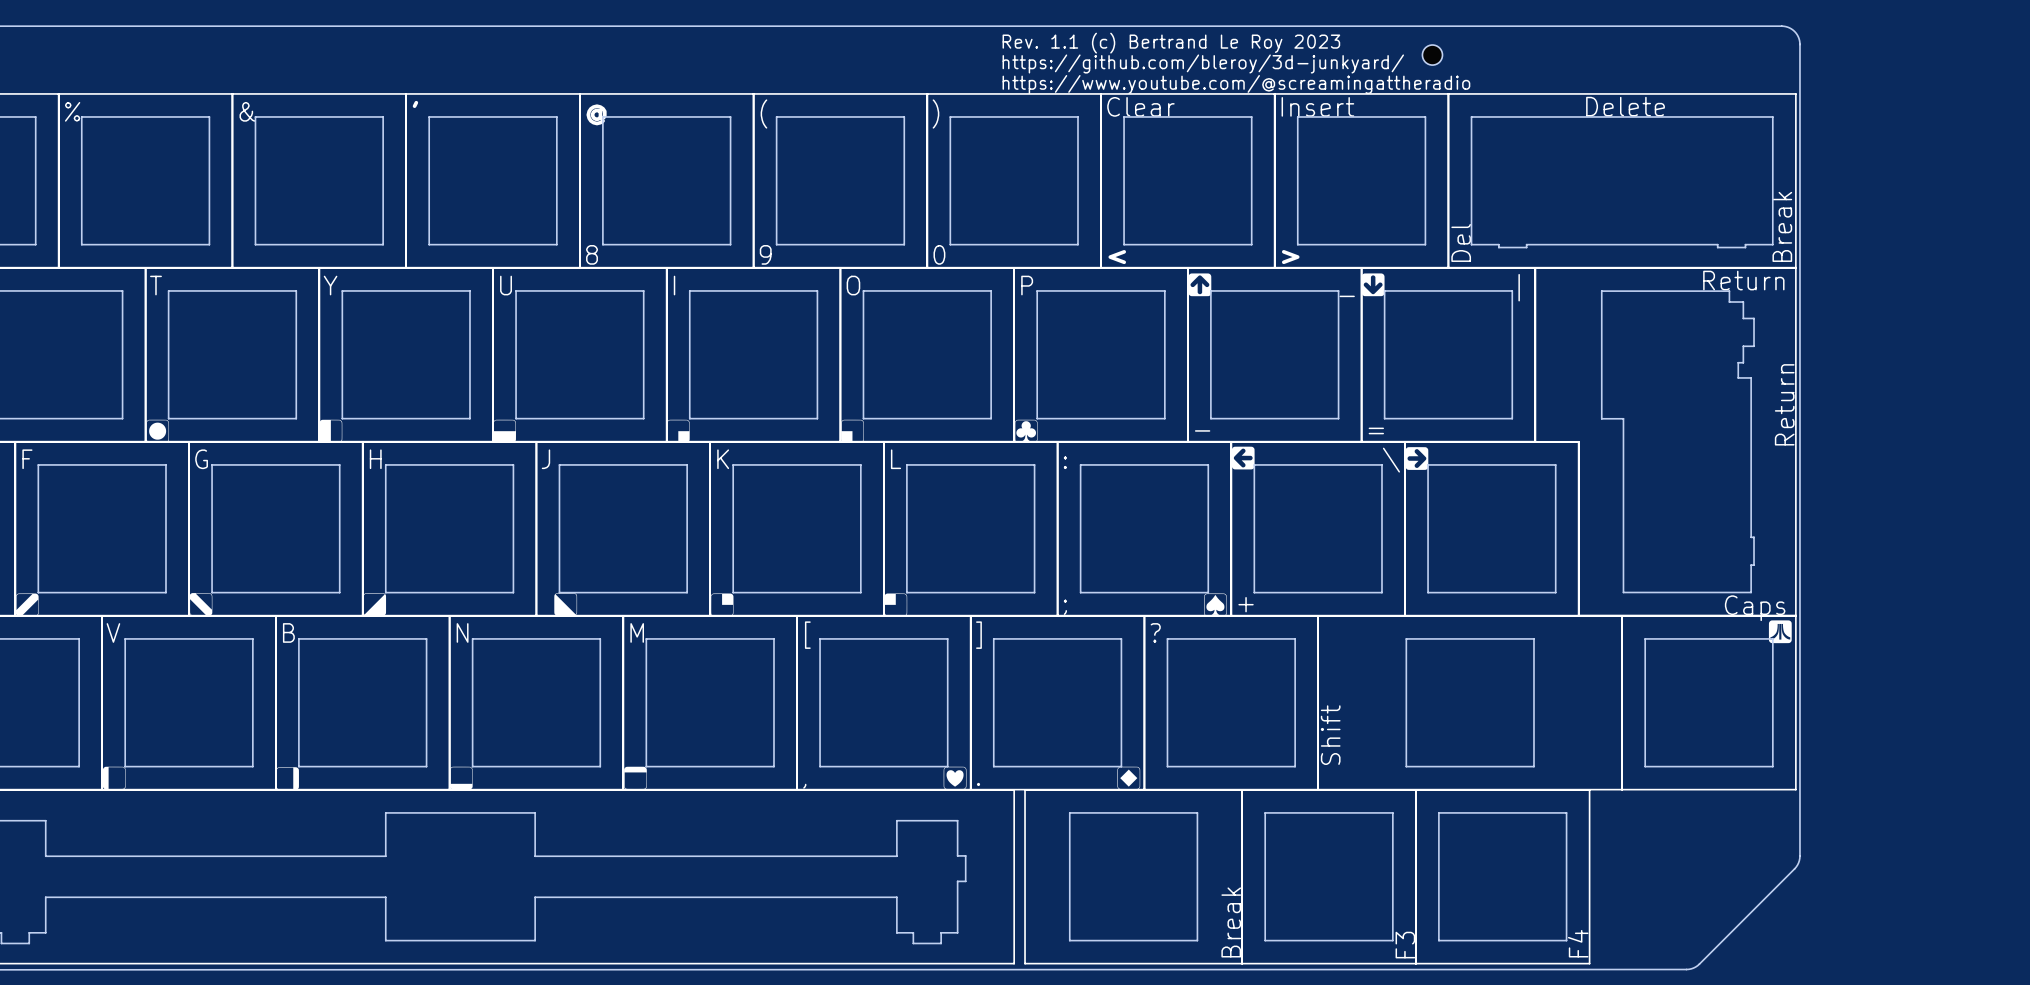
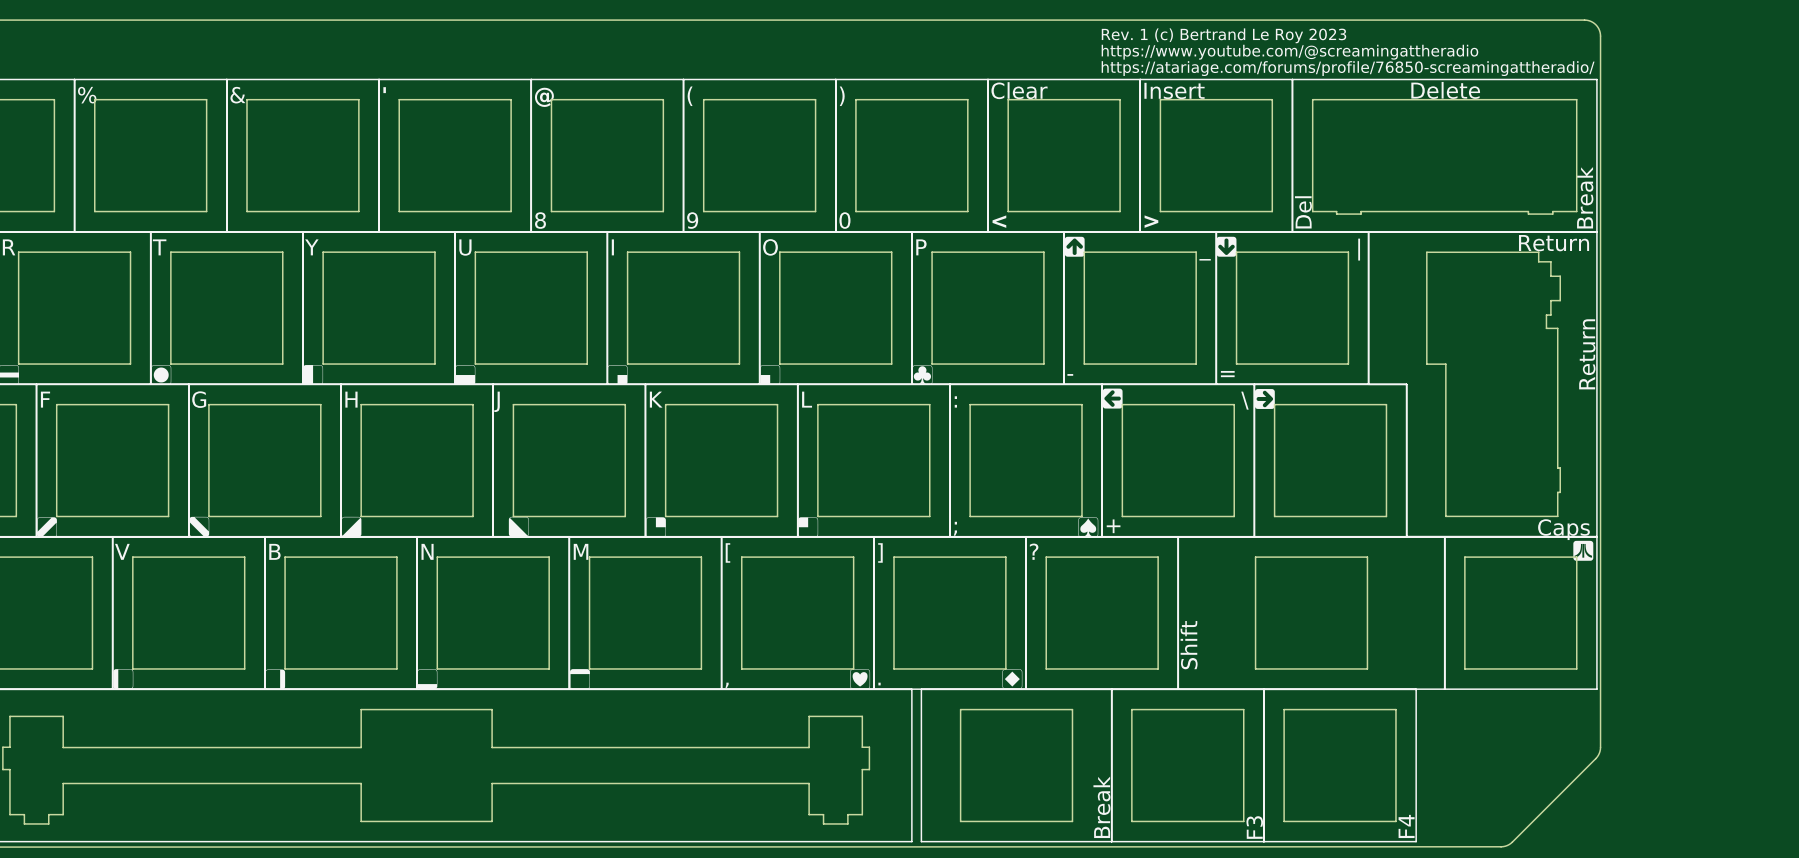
text: Rev. 1.1 (c) Bertrand Le Roy 2023 (1171, 43) -> none
text: none -> Rev. 1 (c) Bertrand Le Roy 2023 (1223, 35)
part: (1432, 55) -> none
text: https://github.com/bleroy/3d-junkyard/ (1203, 63) -> none
text: none -> https://www.youtube.com/@screamingattheradio (1289, 52)
text: none -> https://atariage.com/forums/profile/76850-screamingattheradio/ (1348, 68)
text: https://www.youtube.com/@screamingattheradio (1236, 84) -> none

